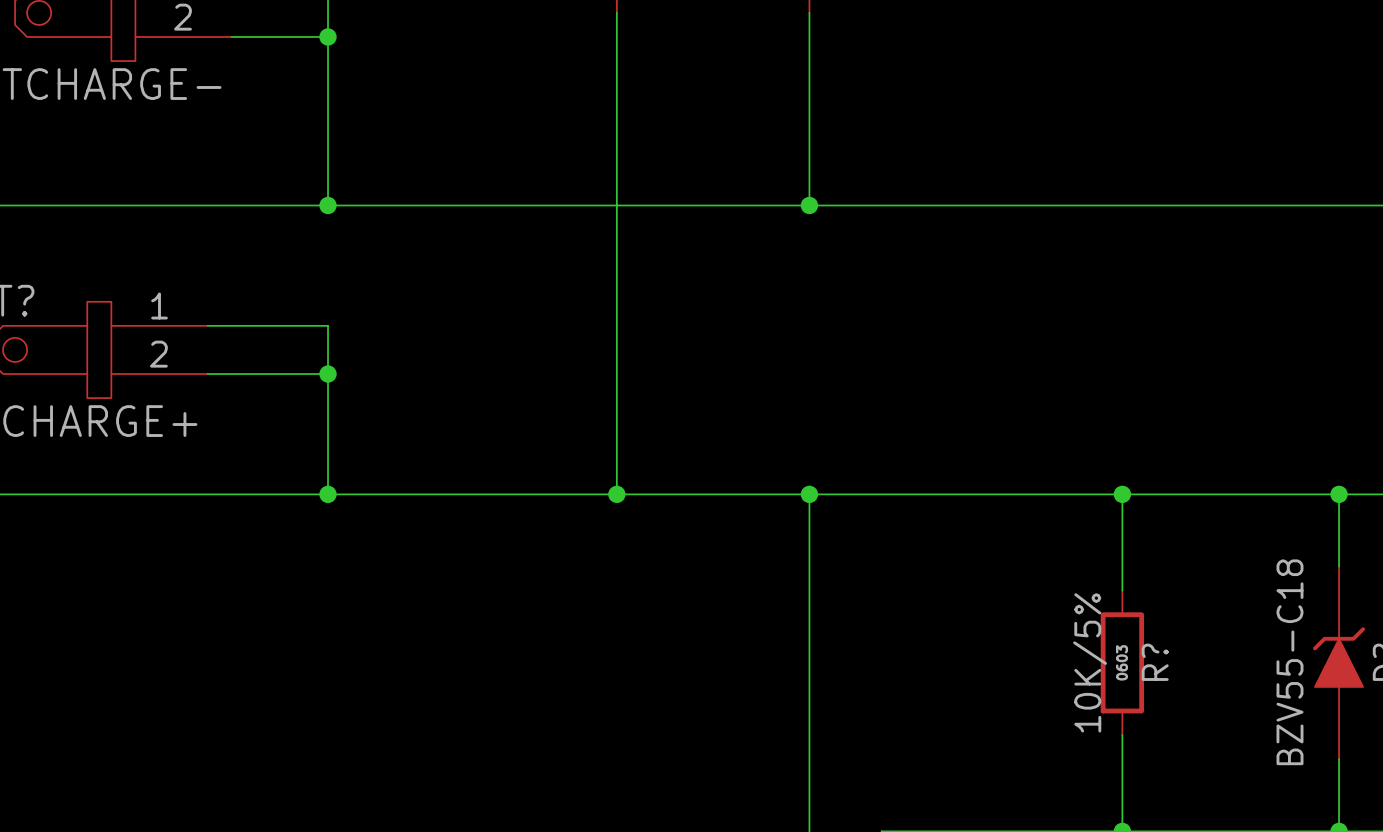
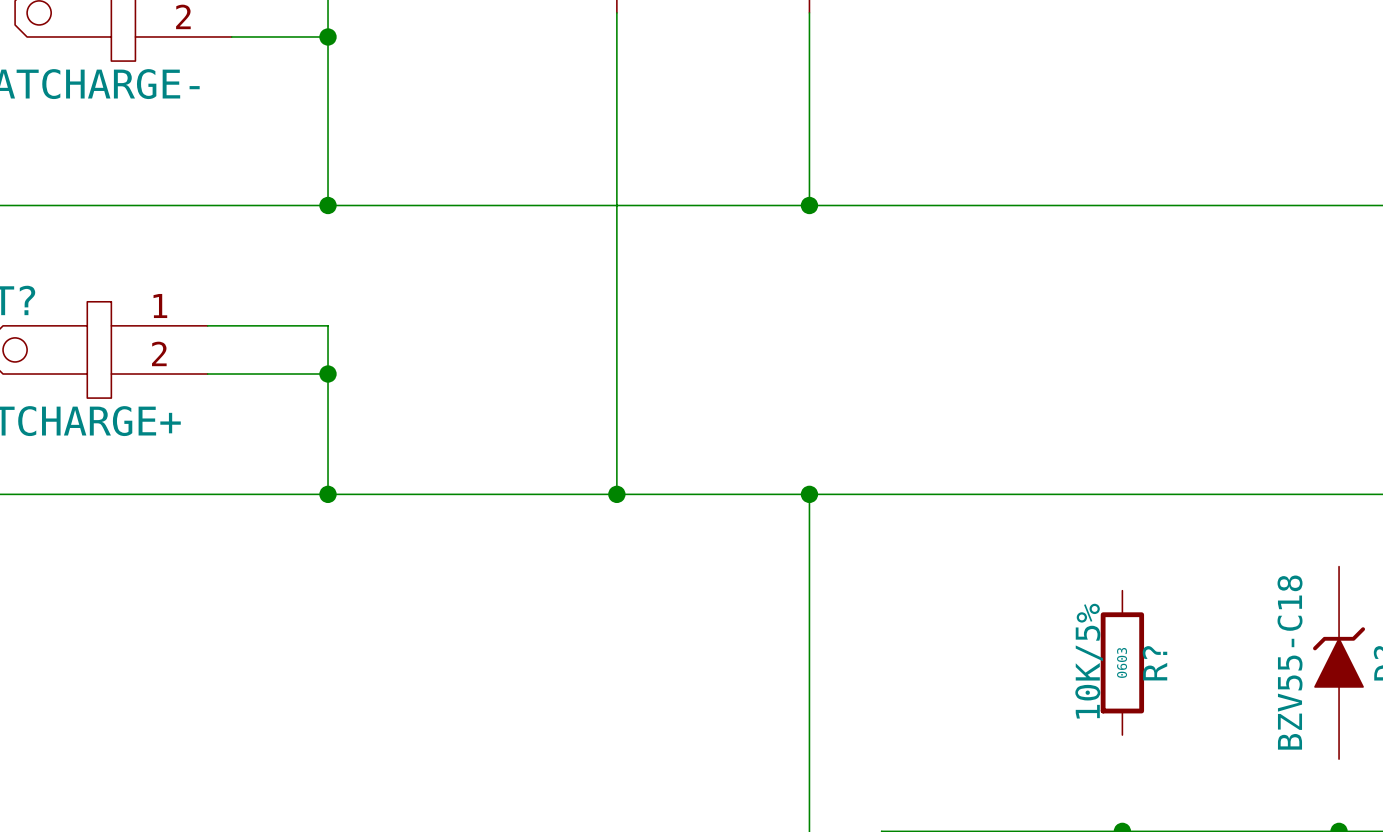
wire: (1122, 494) (1122, 590) -> none
junction: (1122, 494) -> none
wire: (1339, 494) (1339, 566) -> none
junction: (1339, 494) -> none
wire: (1122, 735) (1122, 831) -> none
wire: (1339, 759) (1339, 831) -> none

